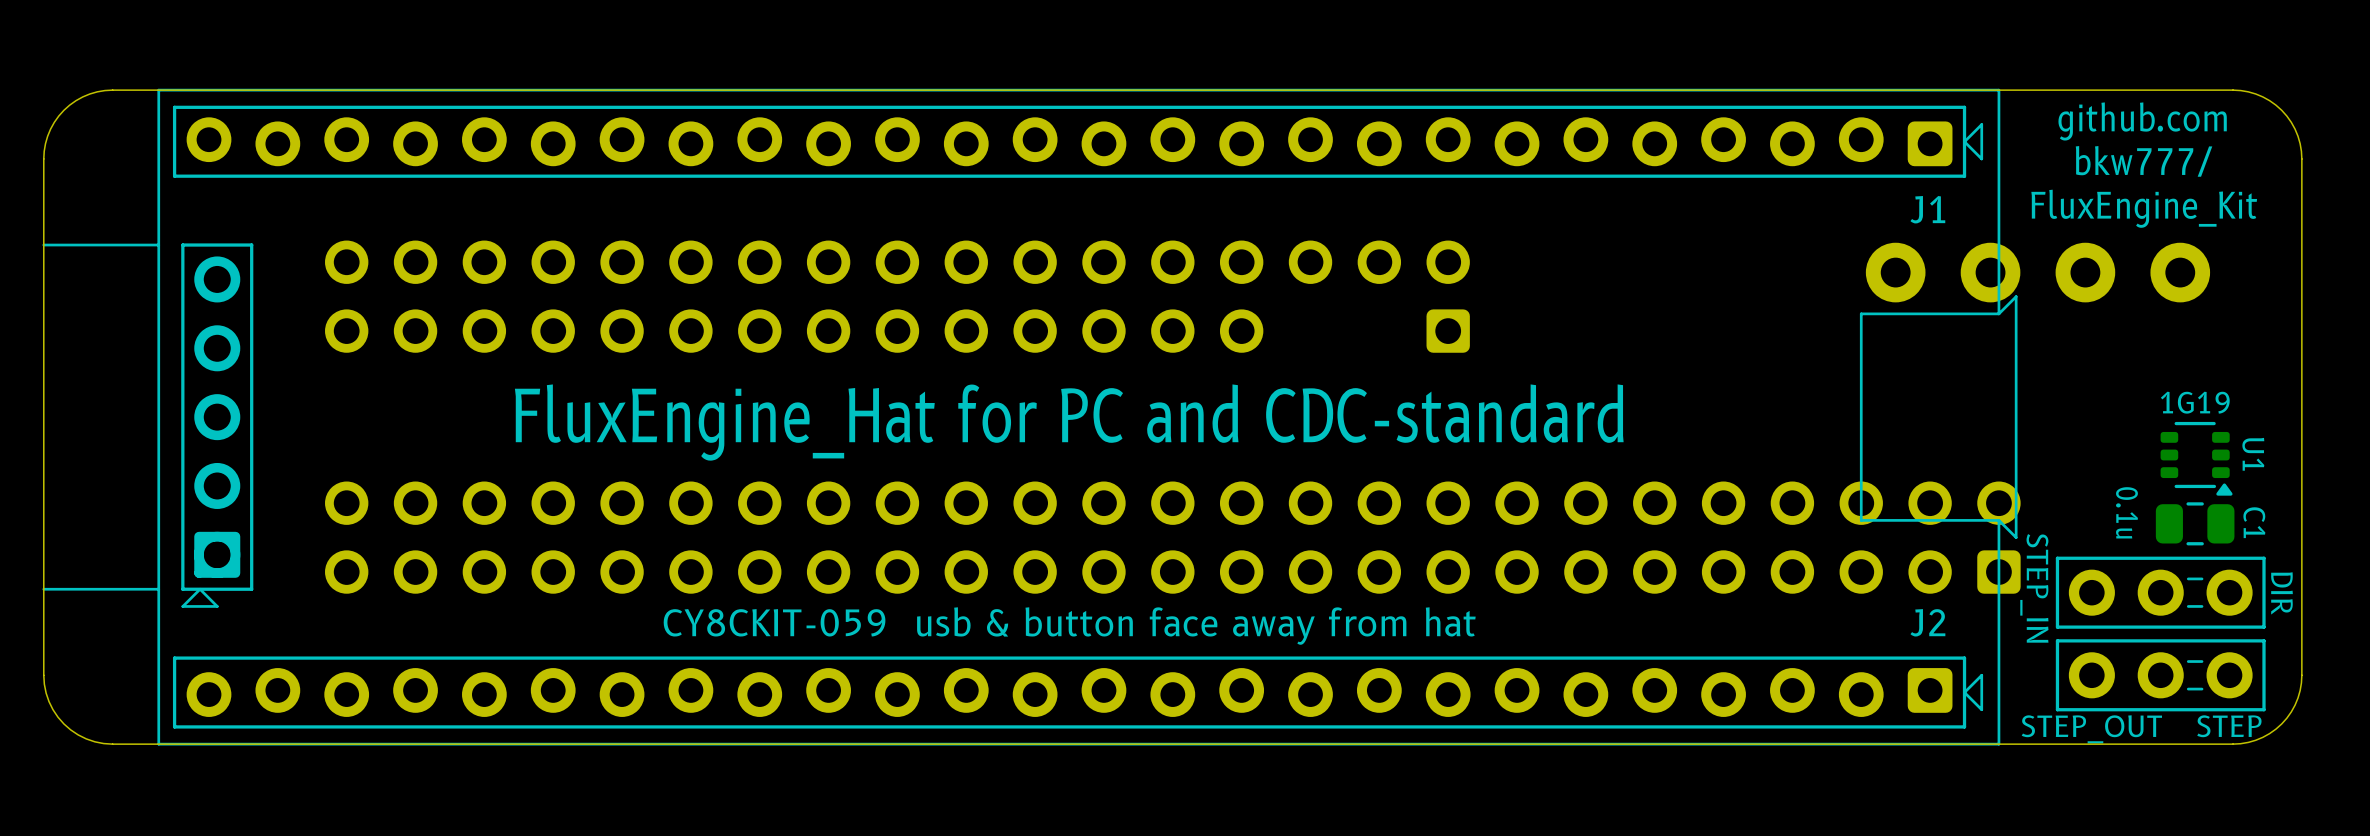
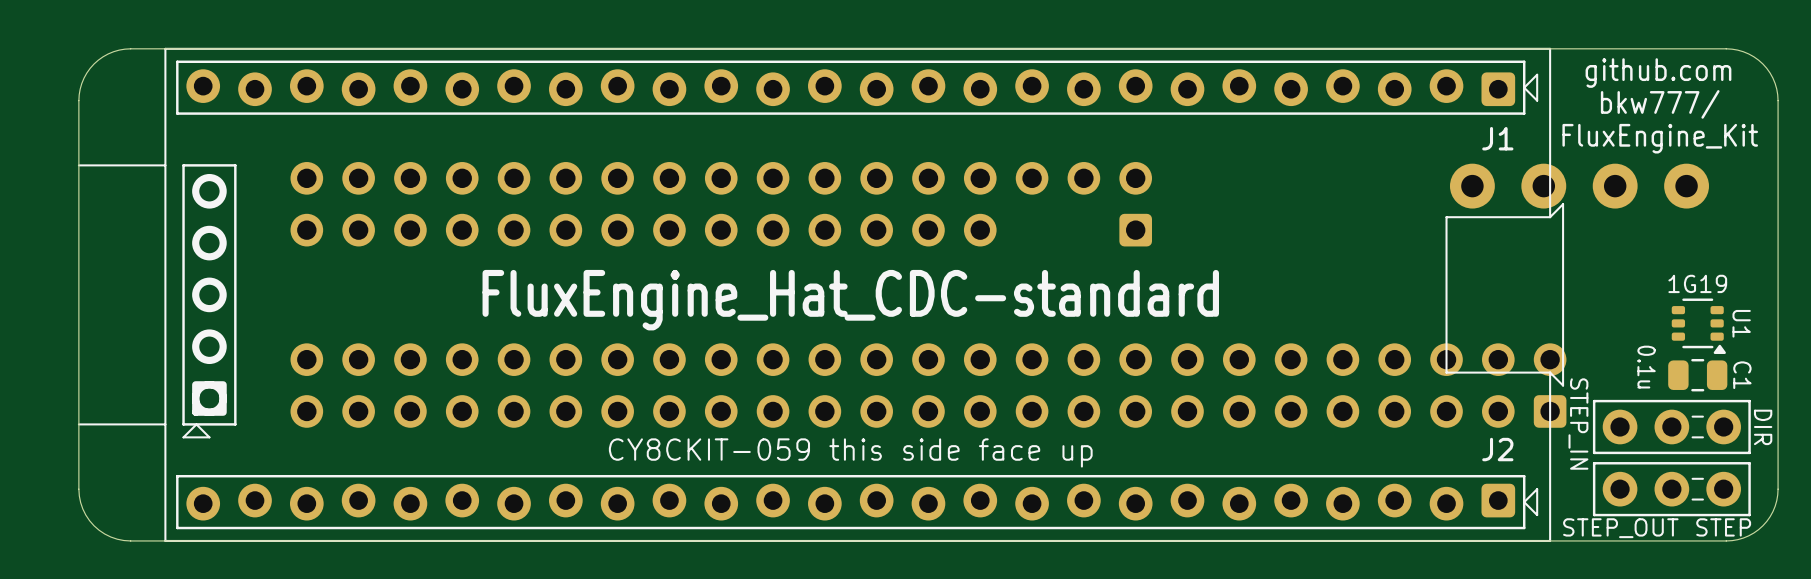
text: FluxEngine_Hat for PC and CDC-standard (1069, 422) -> FluxEngine_Hat_CDC-standard (850, 300)
text: CY8CKIT-059 usb & button face away from hat (1069, 626) -> CY8CKIT-059 this side face up (850, 452)

